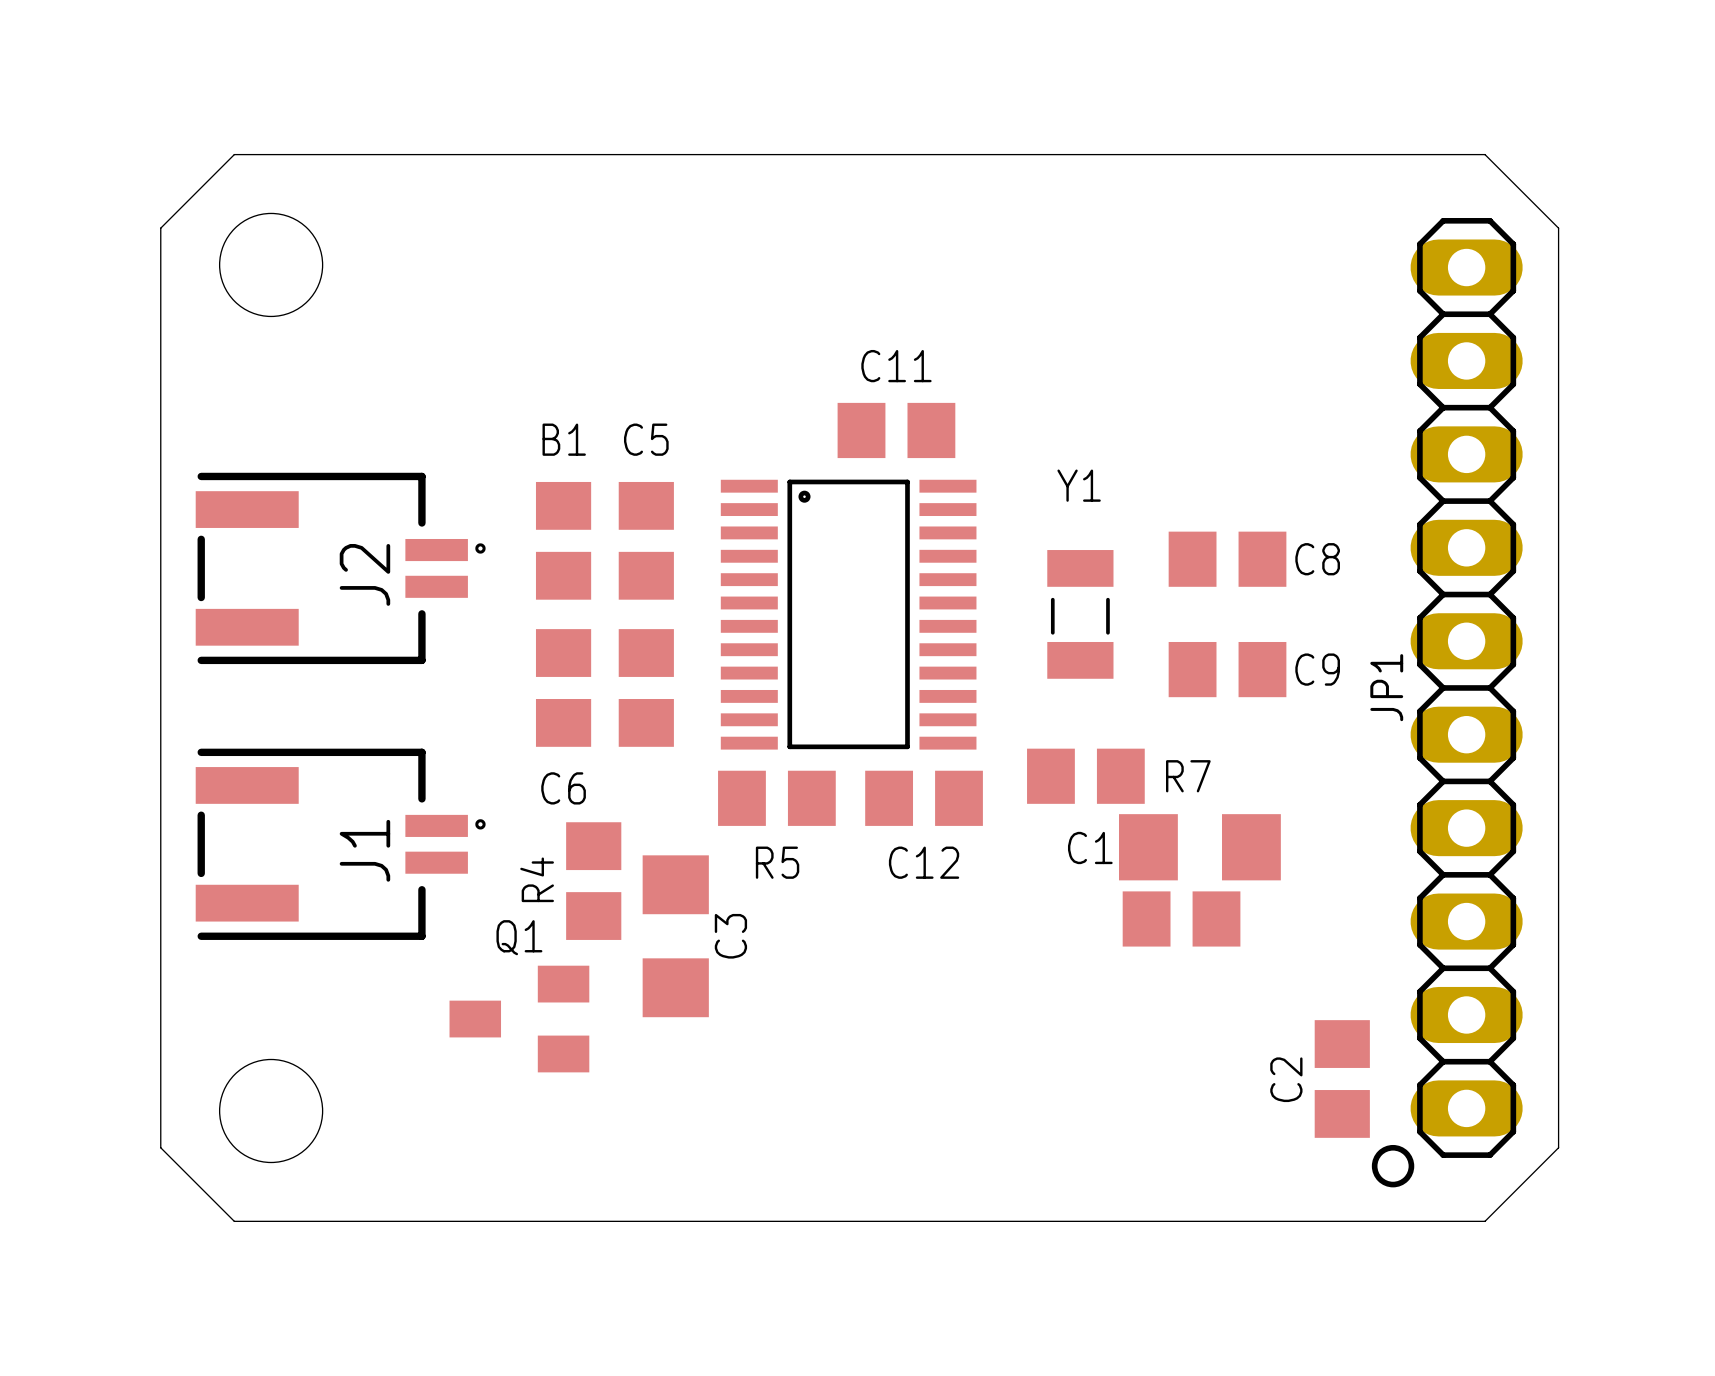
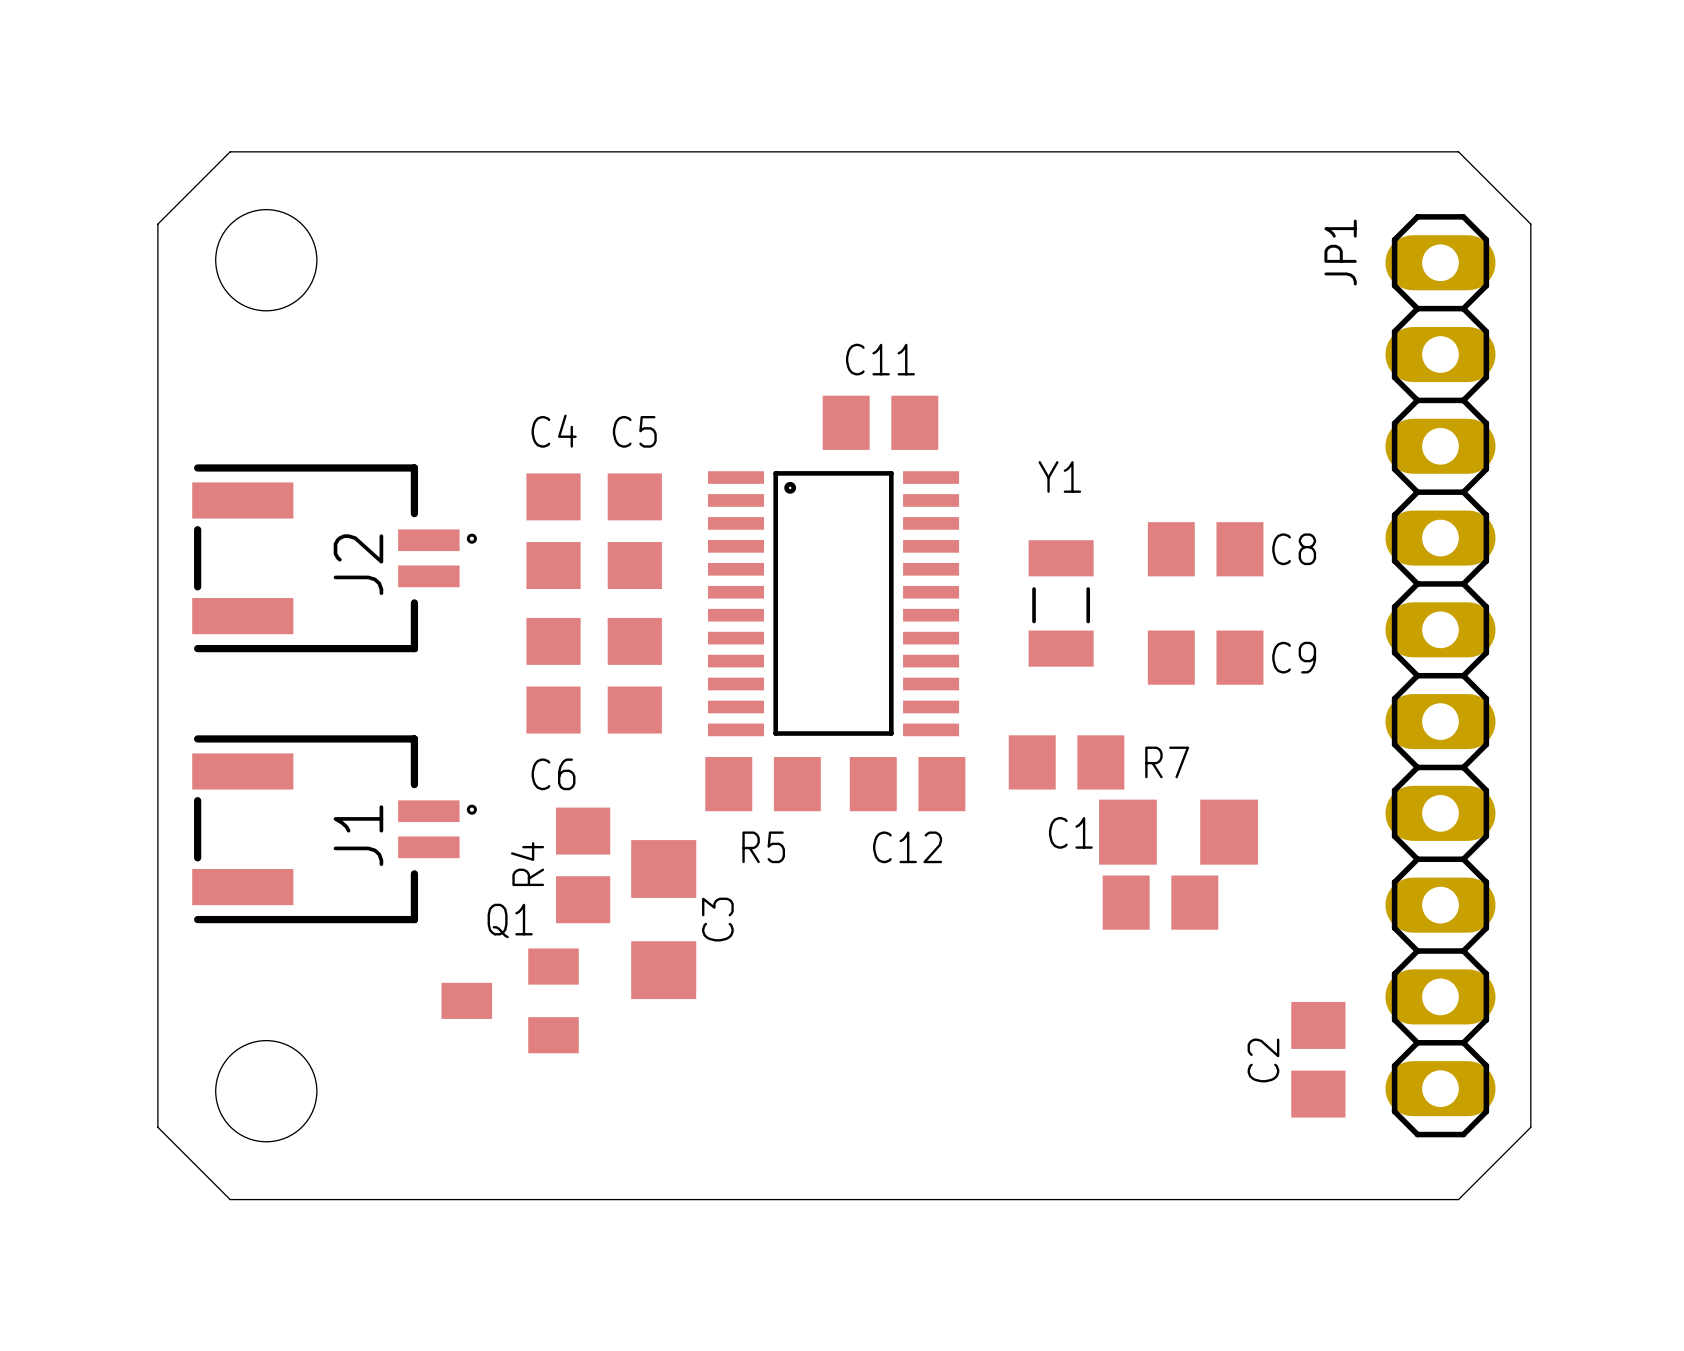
B1 name: B1 (564, 439) -> C4 (554, 431)
JP1 name position: JP1 (1386, 687) -> JP1 (1340, 252)
drawing: [1371, 1144, 1415, 1188] -> none

